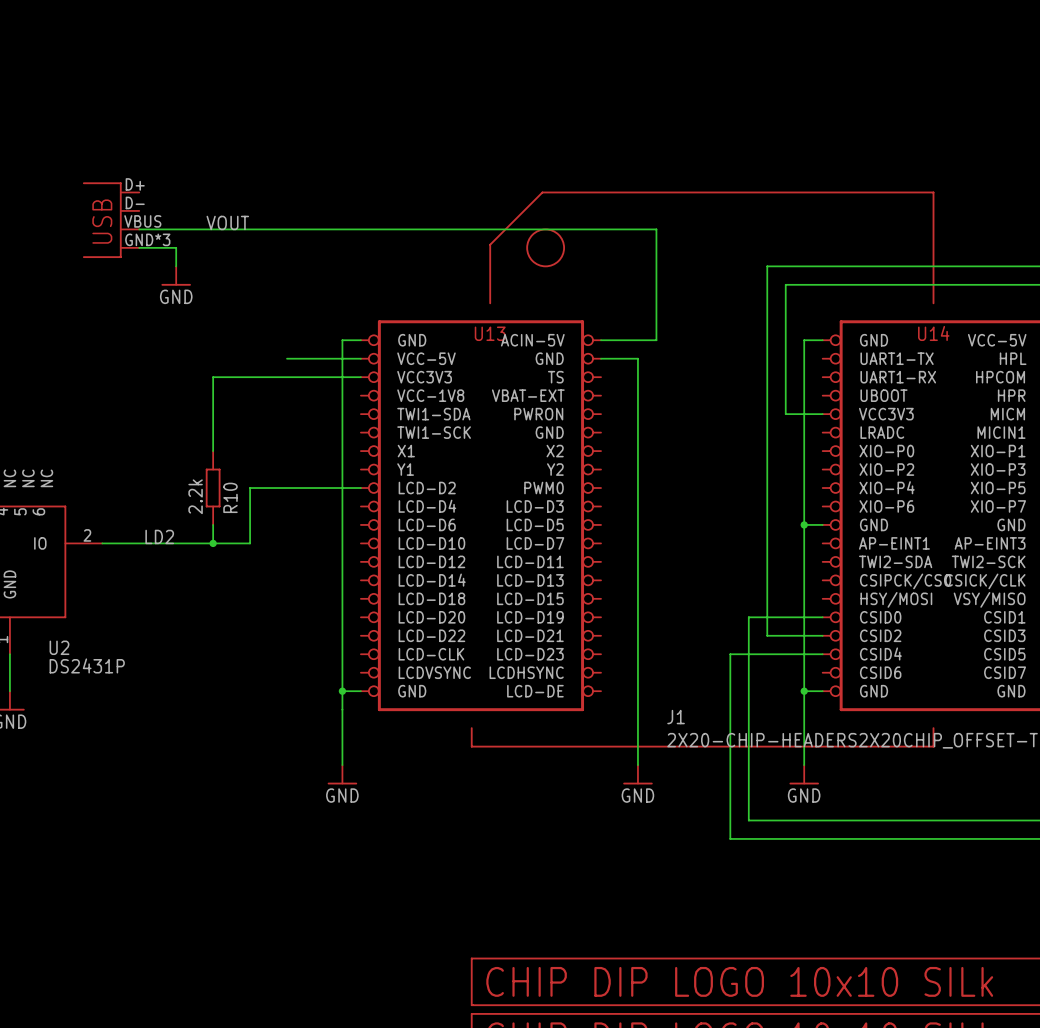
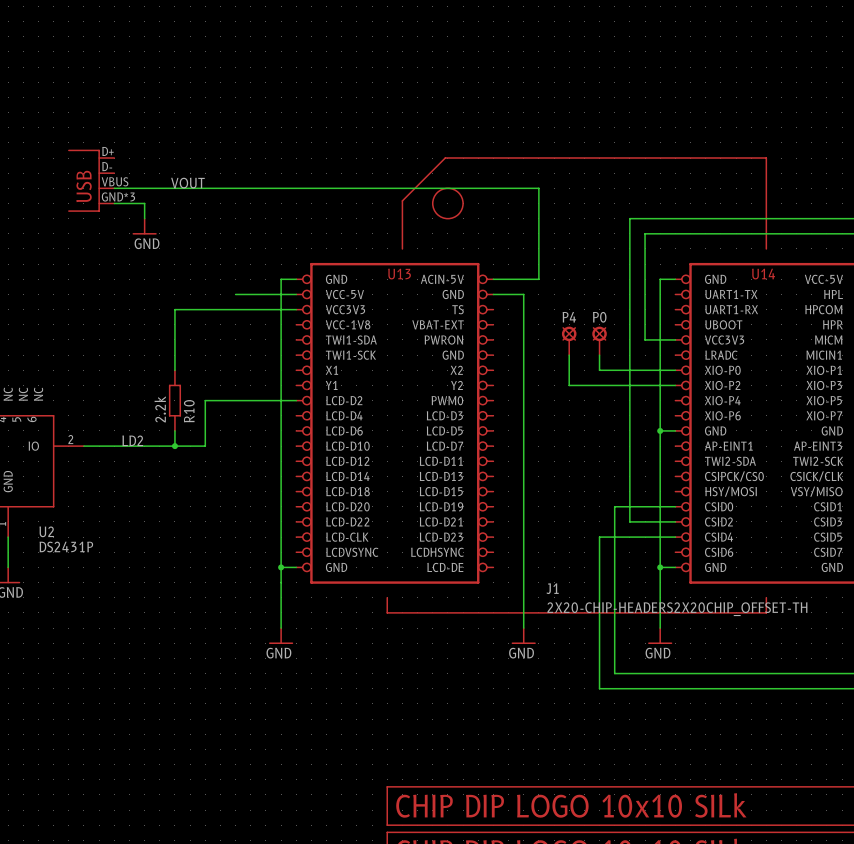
P4: none -> (569, 340)
P0: none -> (599, 340)
wire: none -> (569, 355) (569, 385) (675, 385)
wire: none -> (599, 355) (599, 370) (675, 370)

